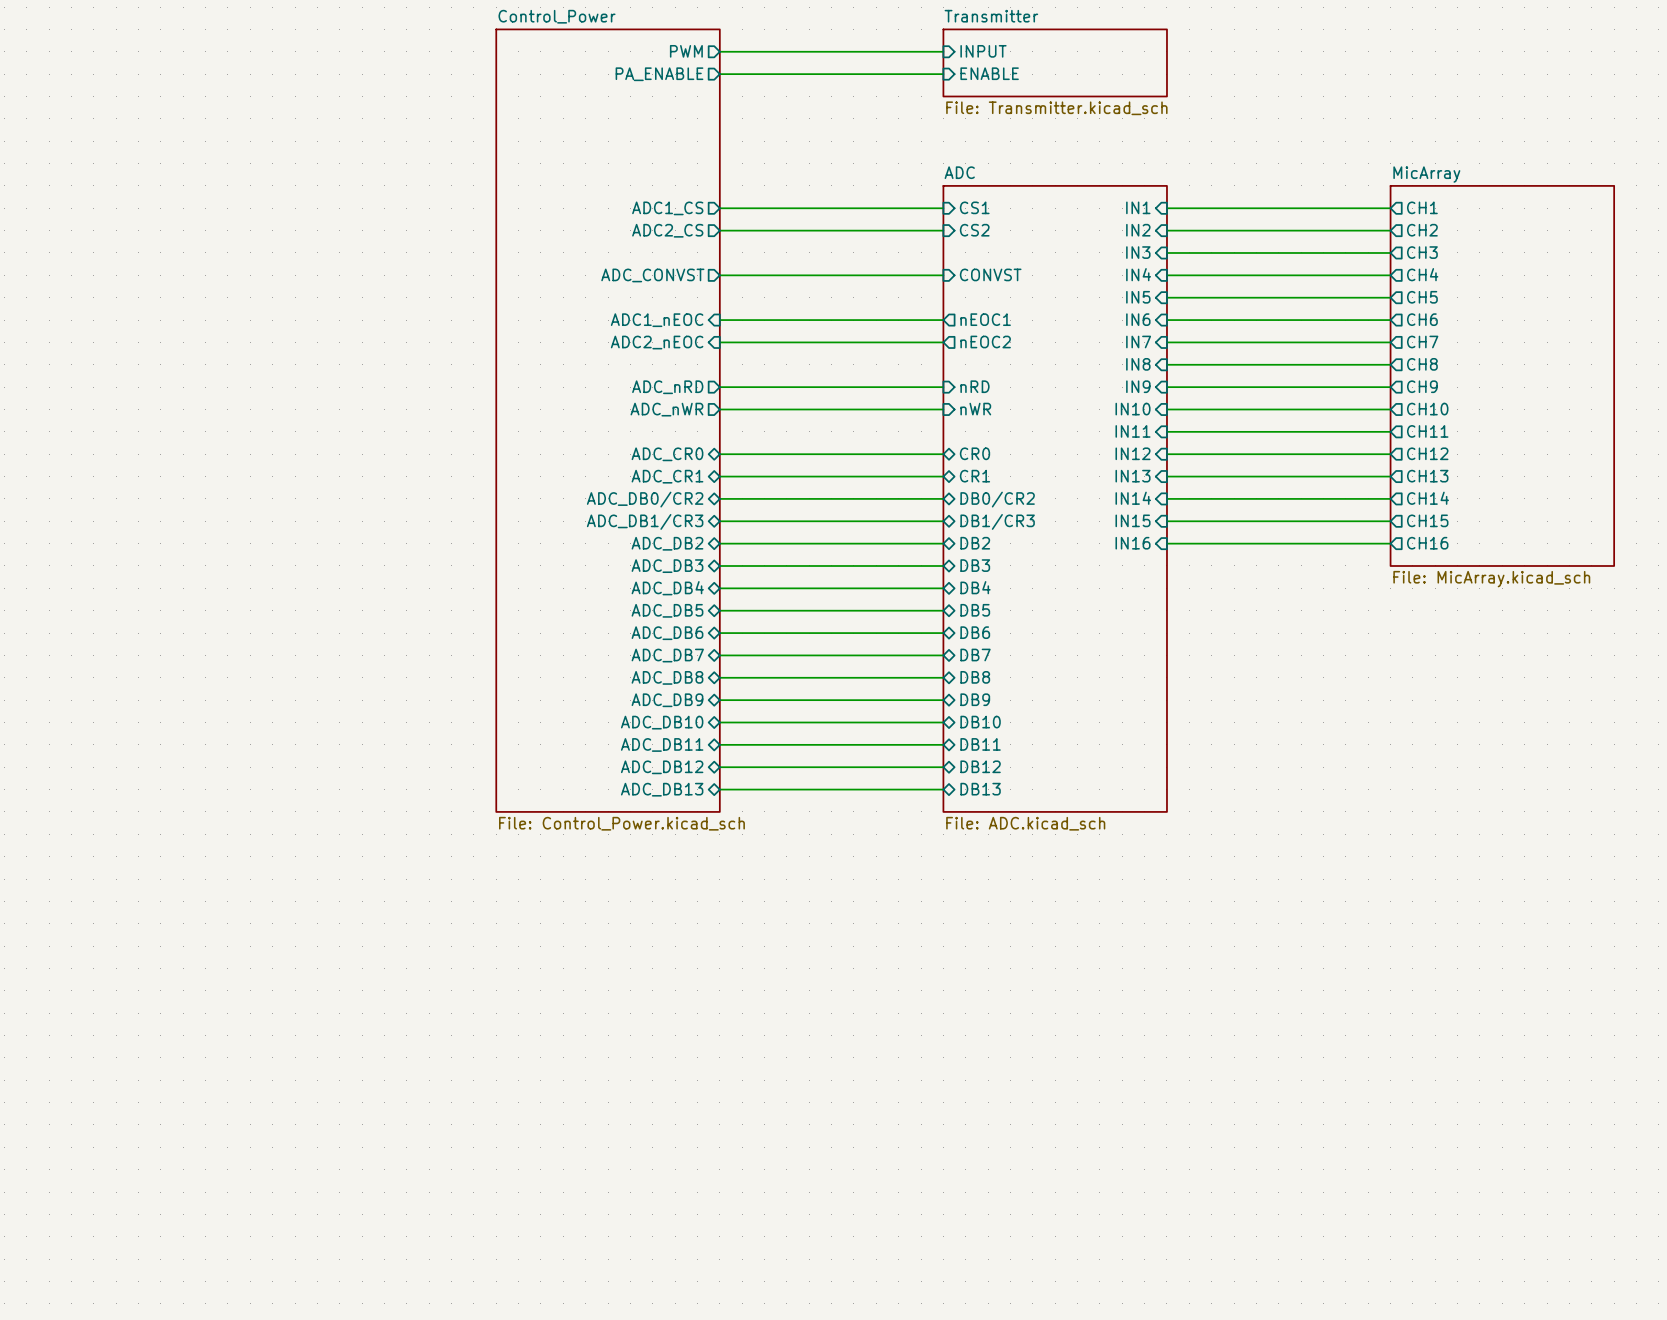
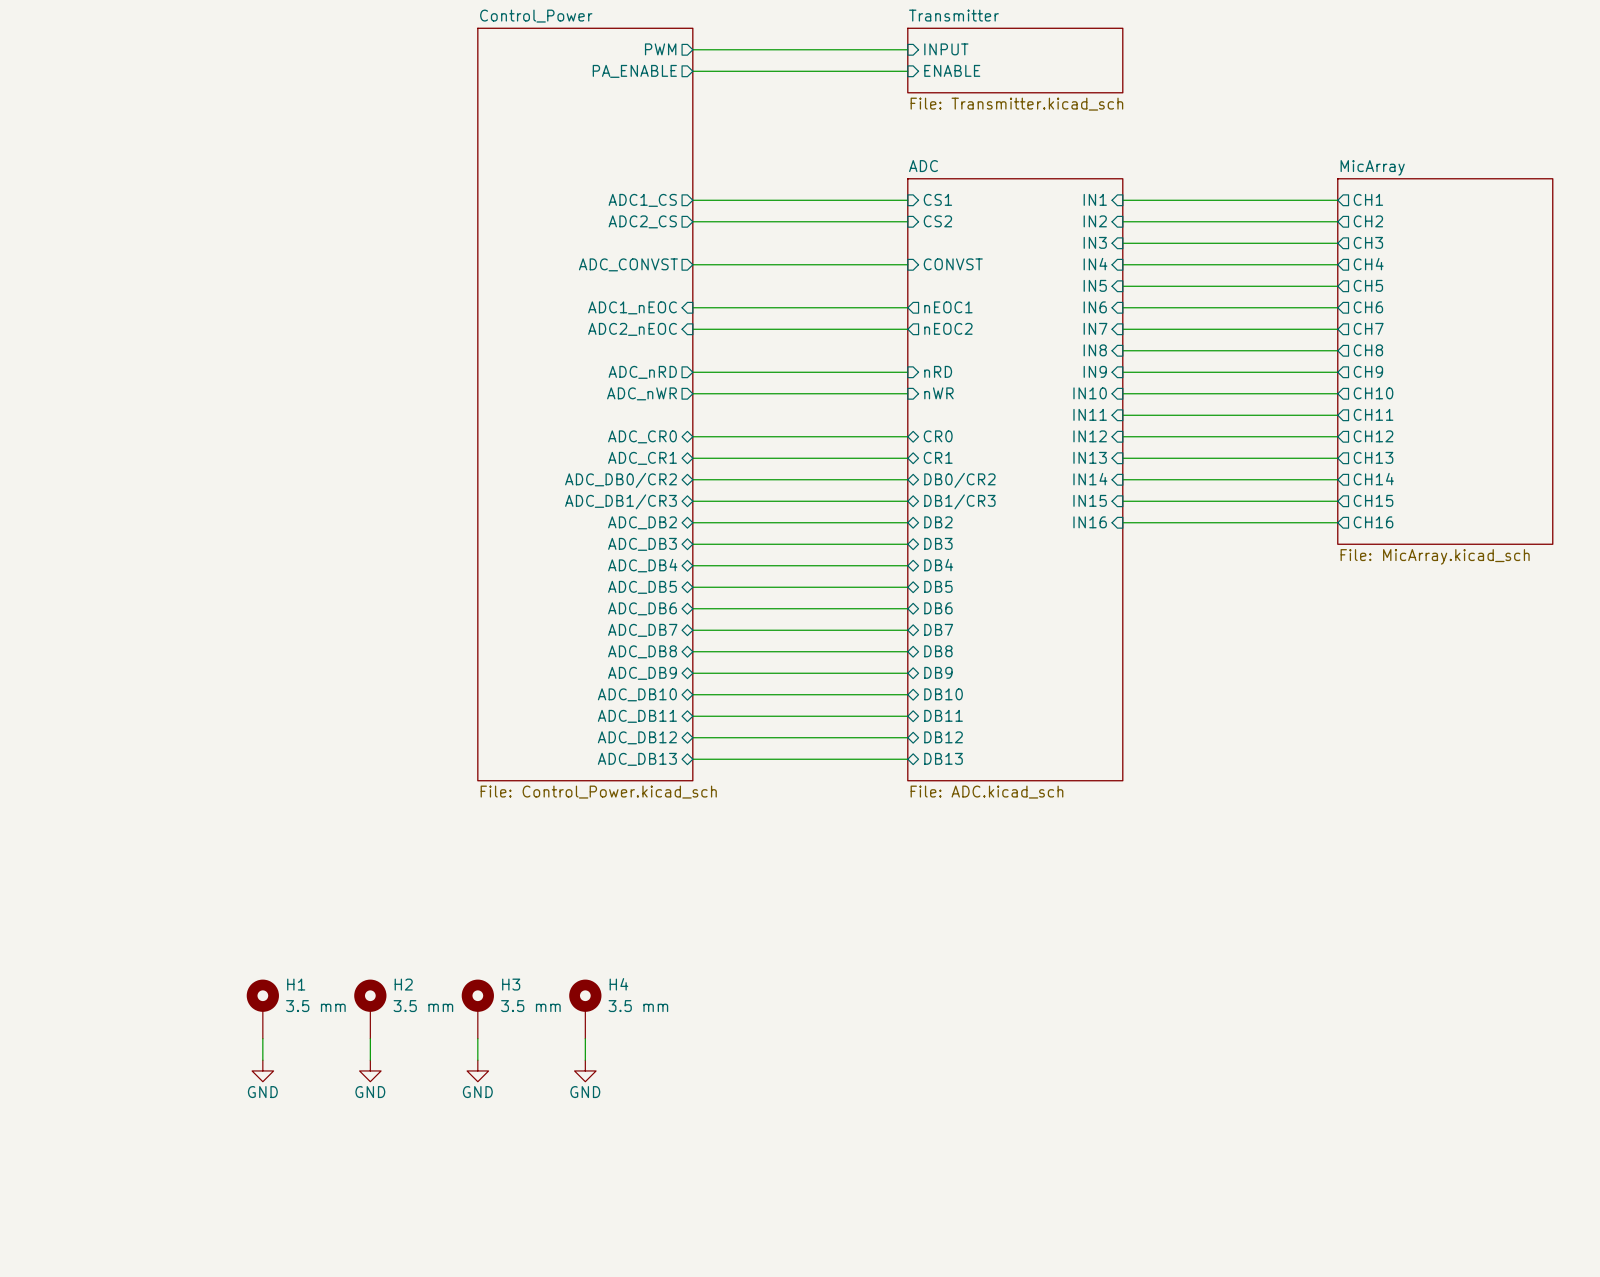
H1: none -> (262, 1009)
H2: none -> (370, 1009)
H3: none -> (477, 1009)
H4: none -> (585, 1009)
wire: none -> (262, 1038) (262, 1060)
wire: none -> (370, 1038) (370, 1060)
wire: none -> (477, 1038) (477, 1060)
wire: none -> (585, 1038) (585, 1060)
power symbol: none -> GND (262, 1070)
power symbol: none -> GND (370, 1070)
power symbol: none -> GND (477, 1070)
power symbol: none -> GND (585, 1070)

